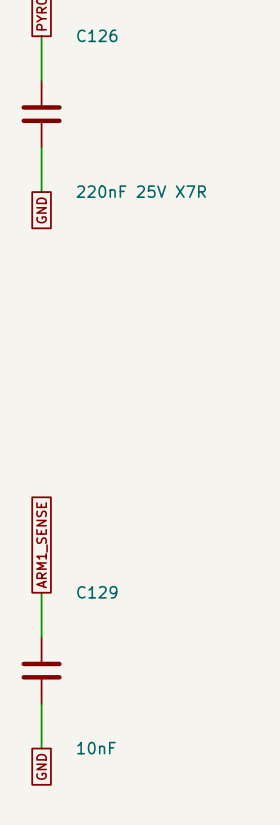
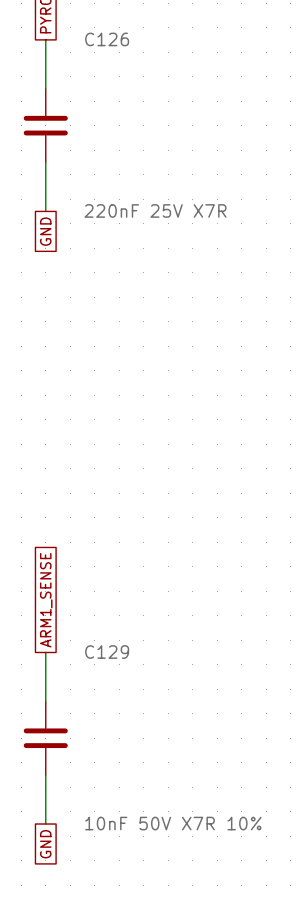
C129 value: 10nF (96, 748) -> 10nF 50V X7R 10% (173, 823)

